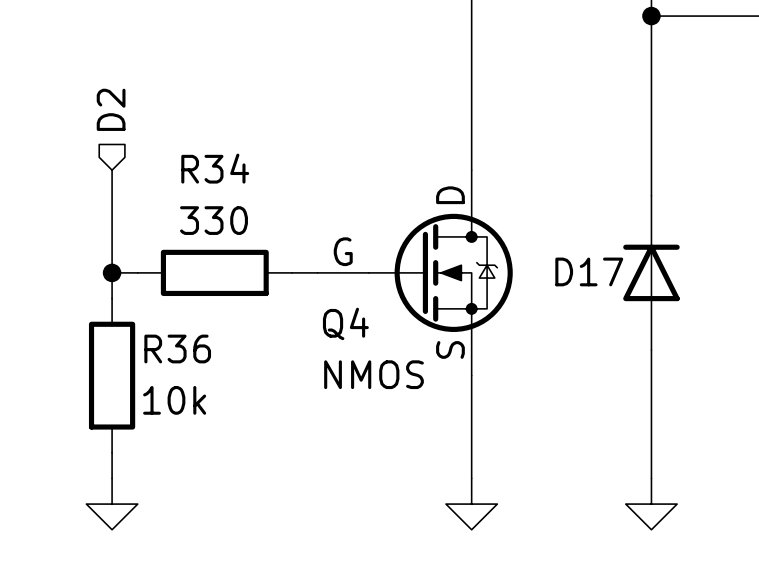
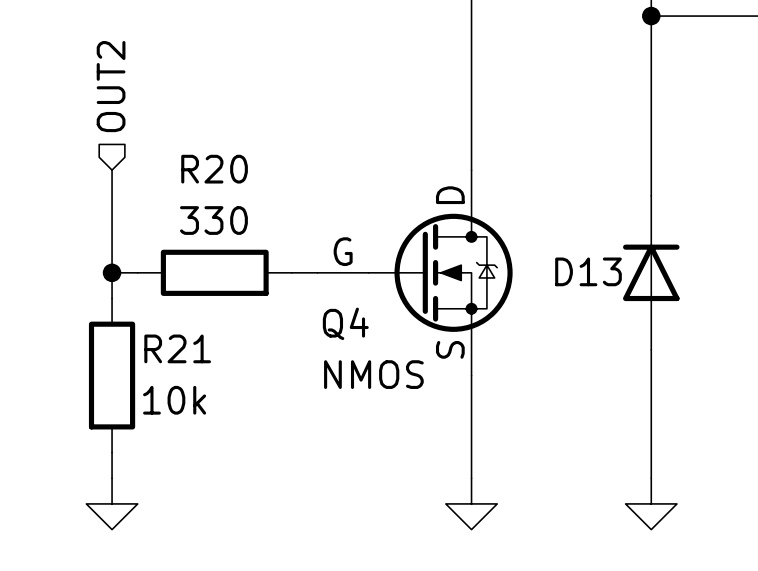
hierarchical label: D2 (111, 109) -> OUT2 (111, 86)
R34 name: R34 (215, 168) -> R20 (214, 169)
D17 name: D17 (589, 271) -> D13 (588, 271)
R36 name: R36 (177, 349) -> R21 (177, 348)

